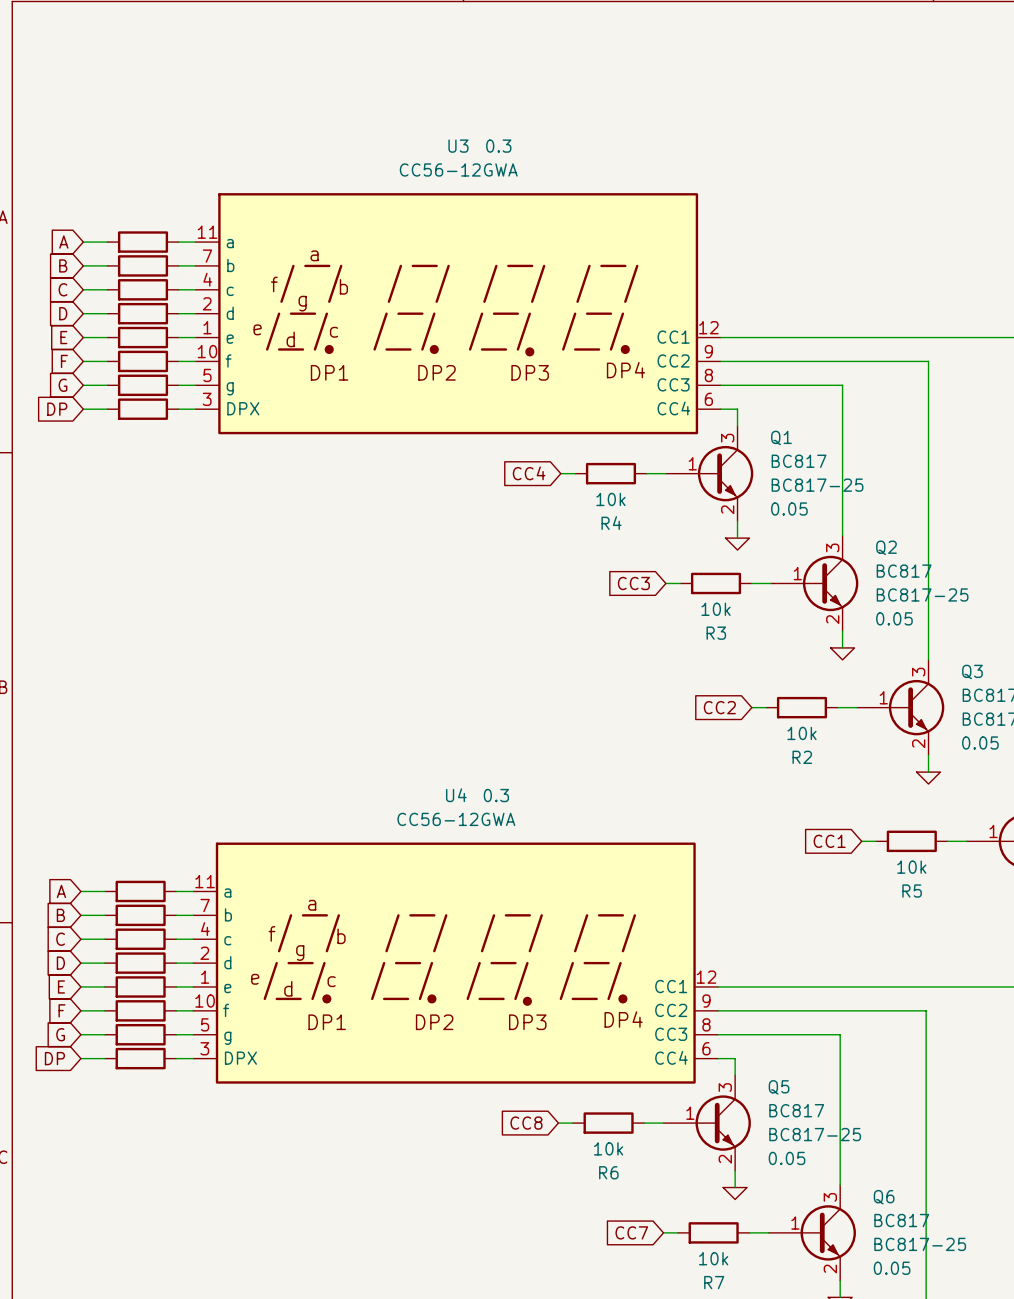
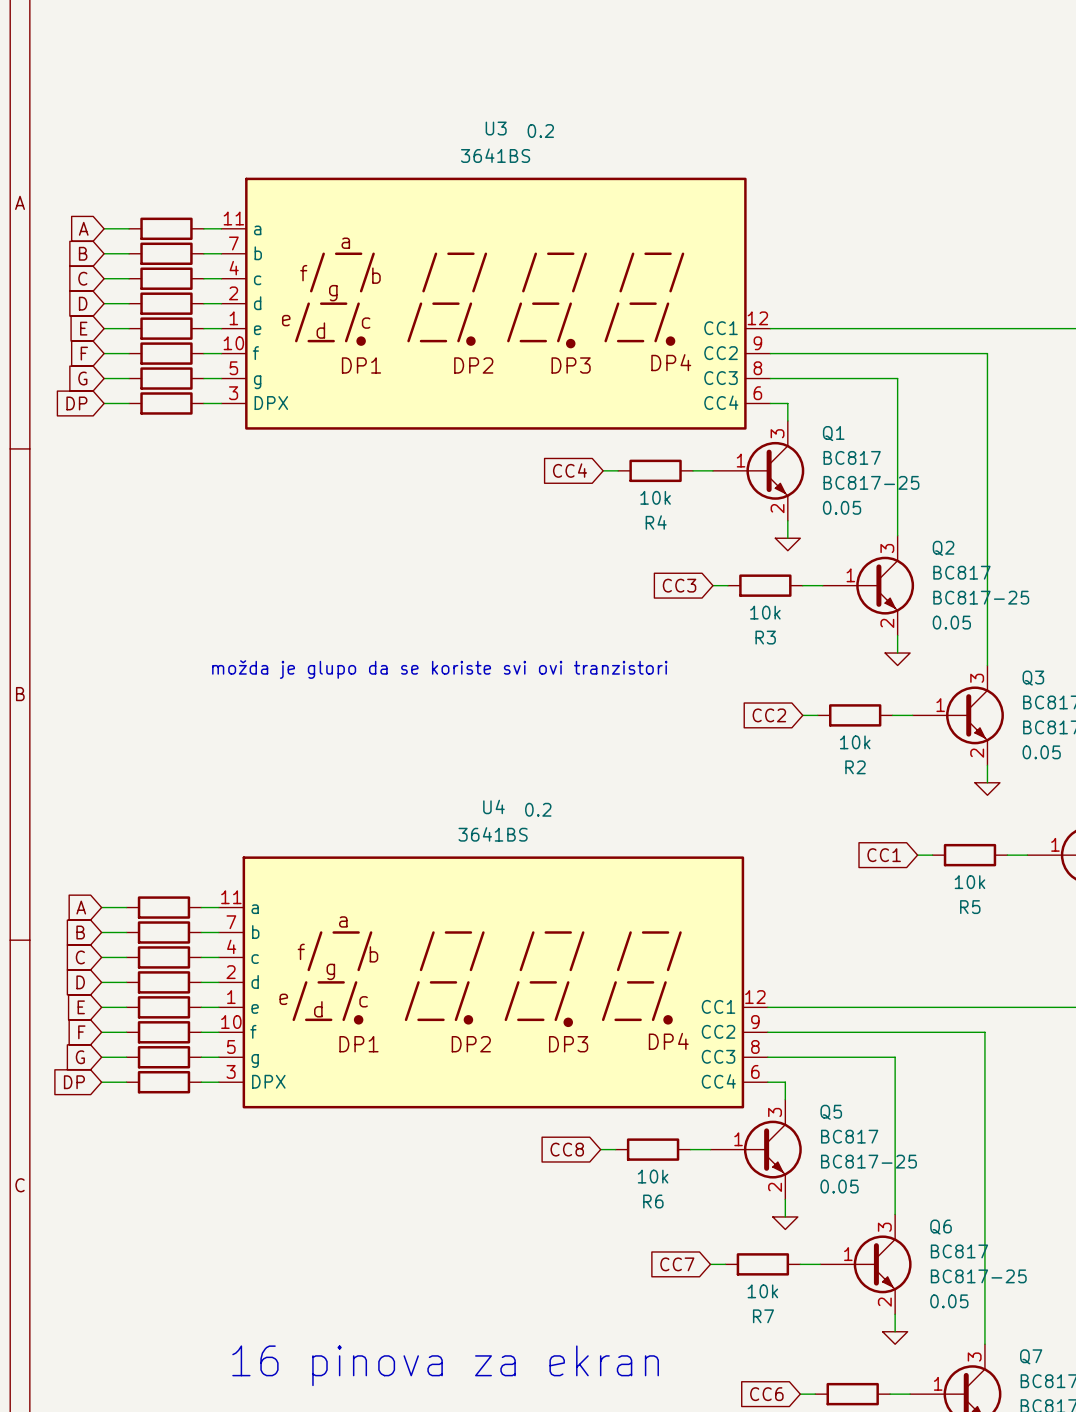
U3 text: 0.3 (498, 146) -> 0.2 (540, 131)
U3 value: CC56-12GWA (458, 169) -> 3641BS (495, 155)
text: none -> možda je glupo da se koriste svi ovi tranzistori (439, 669)
U4 text: 0.3 (496, 795) -> 0.2 (538, 809)
U4 value: CC56-12GWA (456, 819) -> 3641BS (493, 834)

